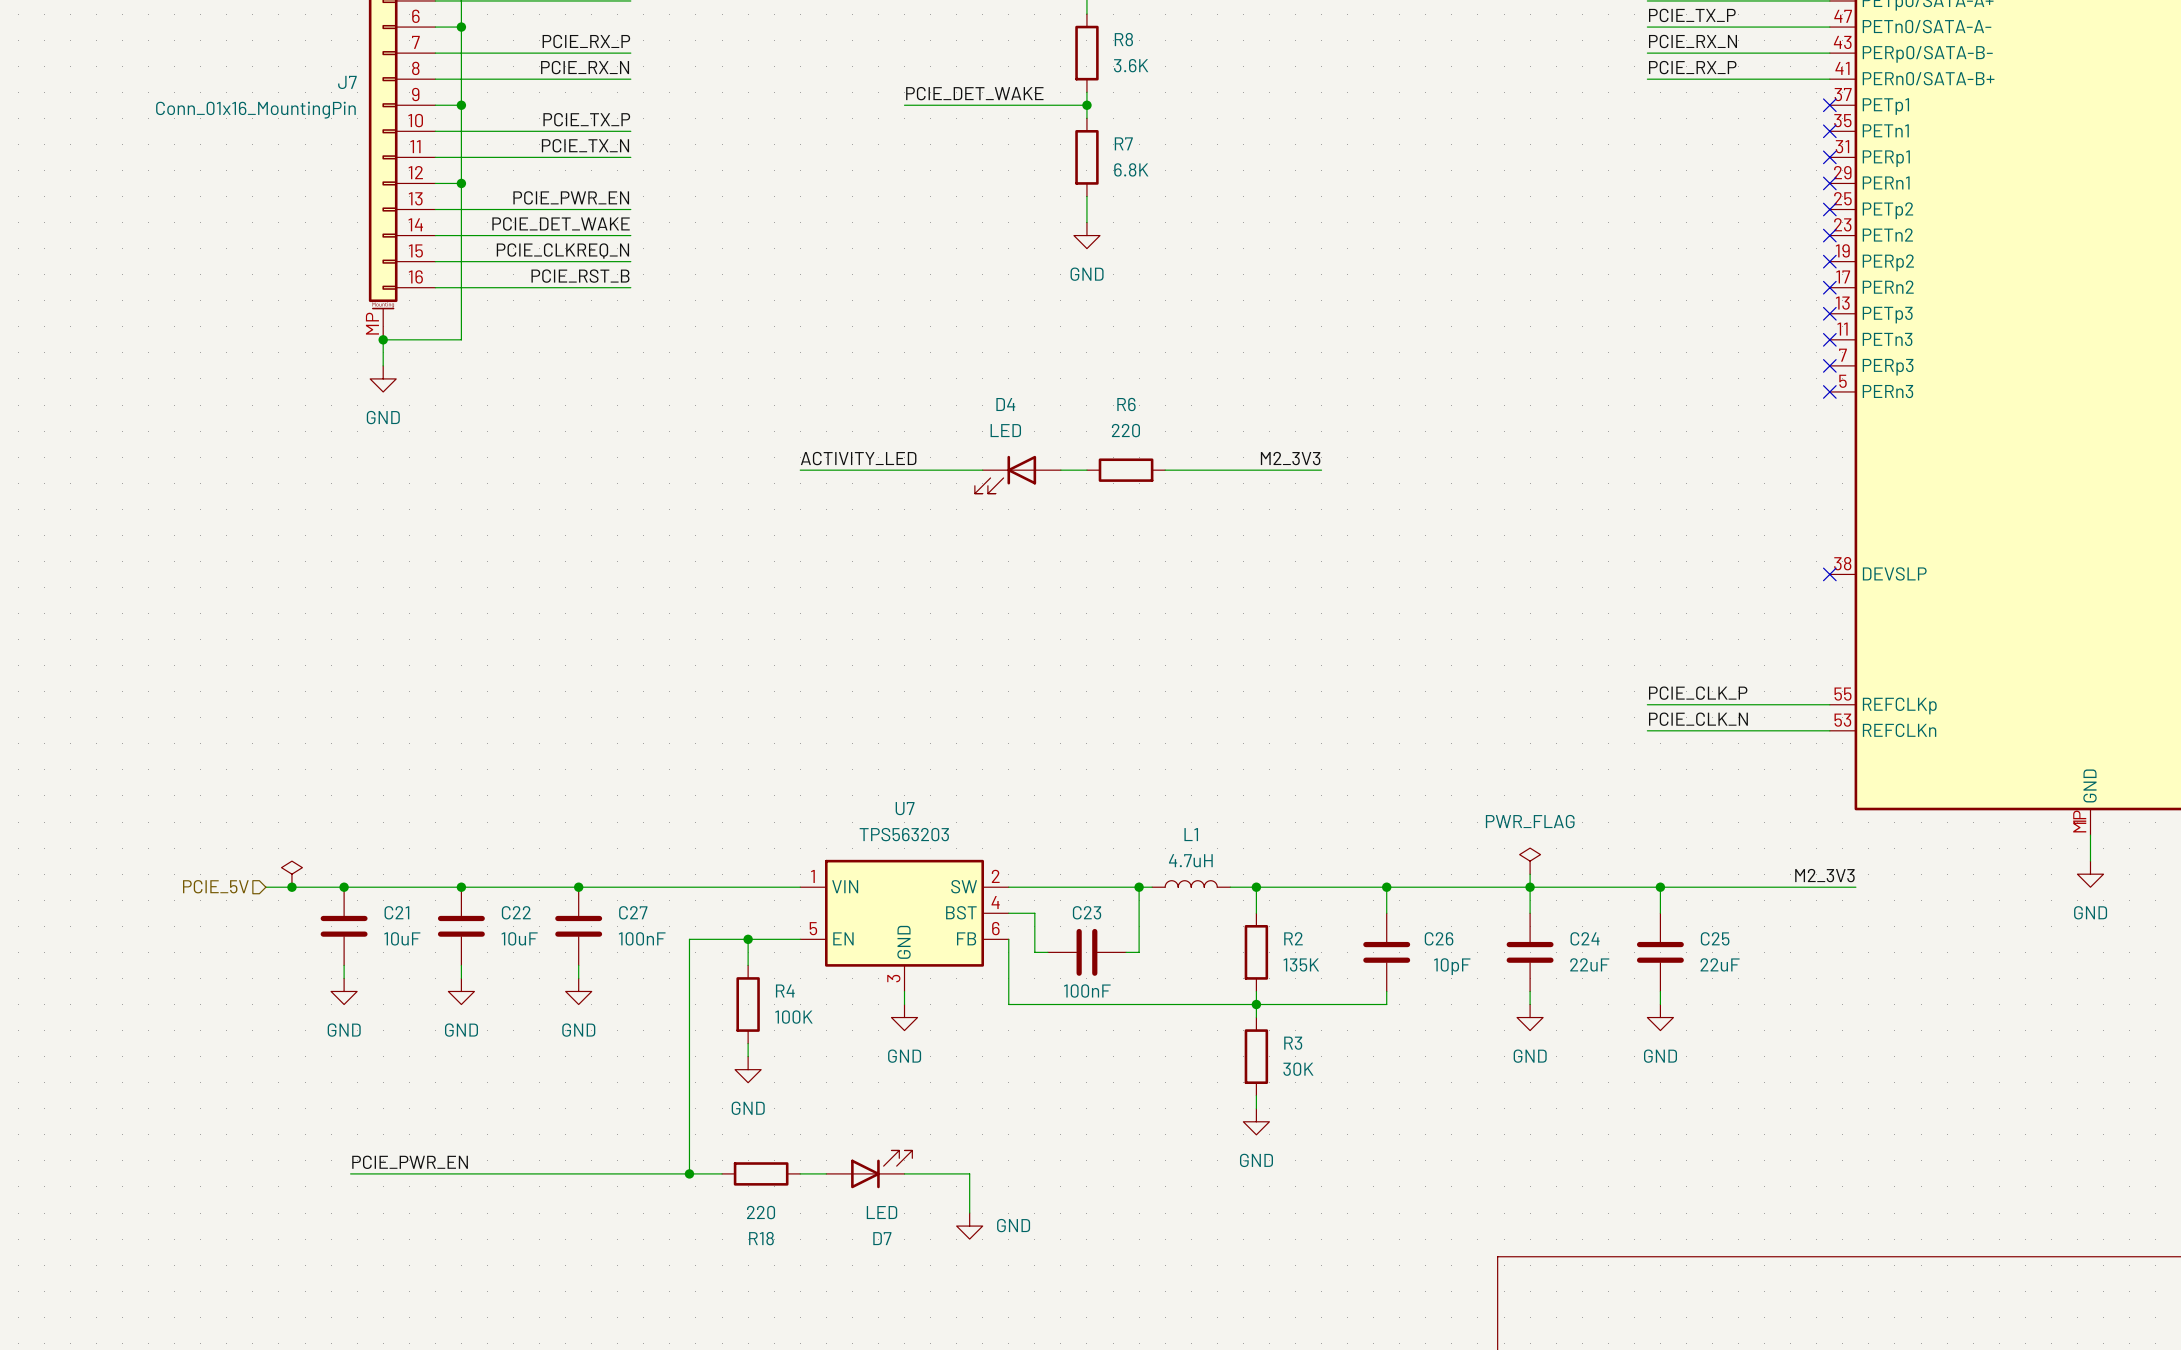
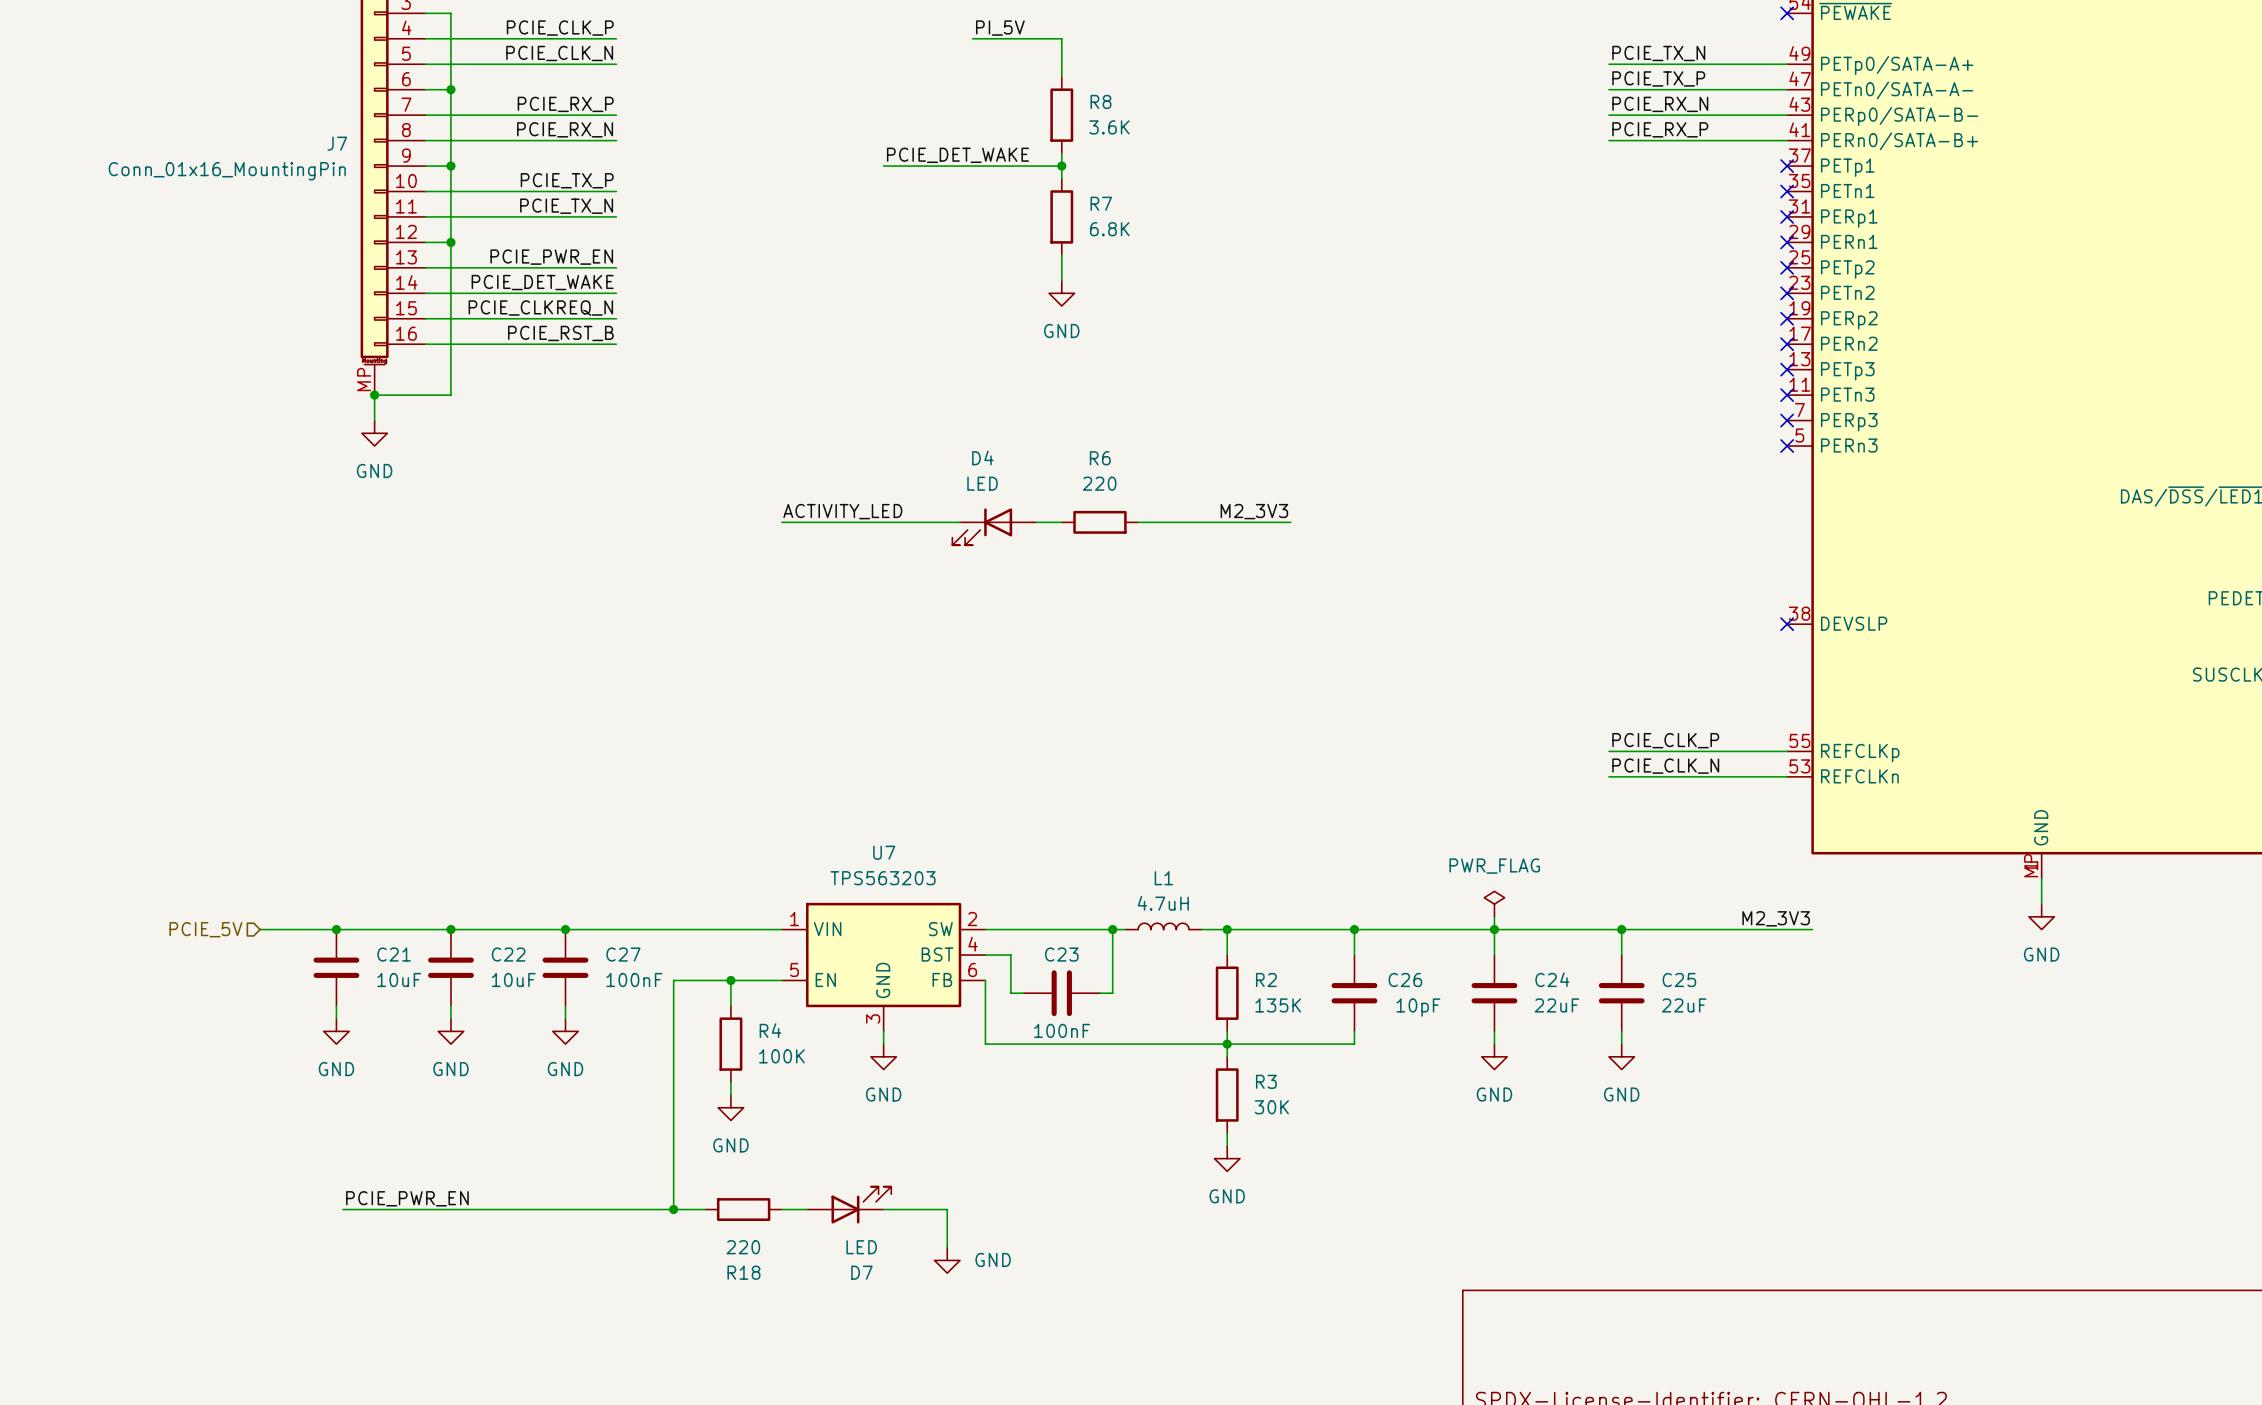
power symbol: (291, 874) -> none
junction: (291, 887) -> none

